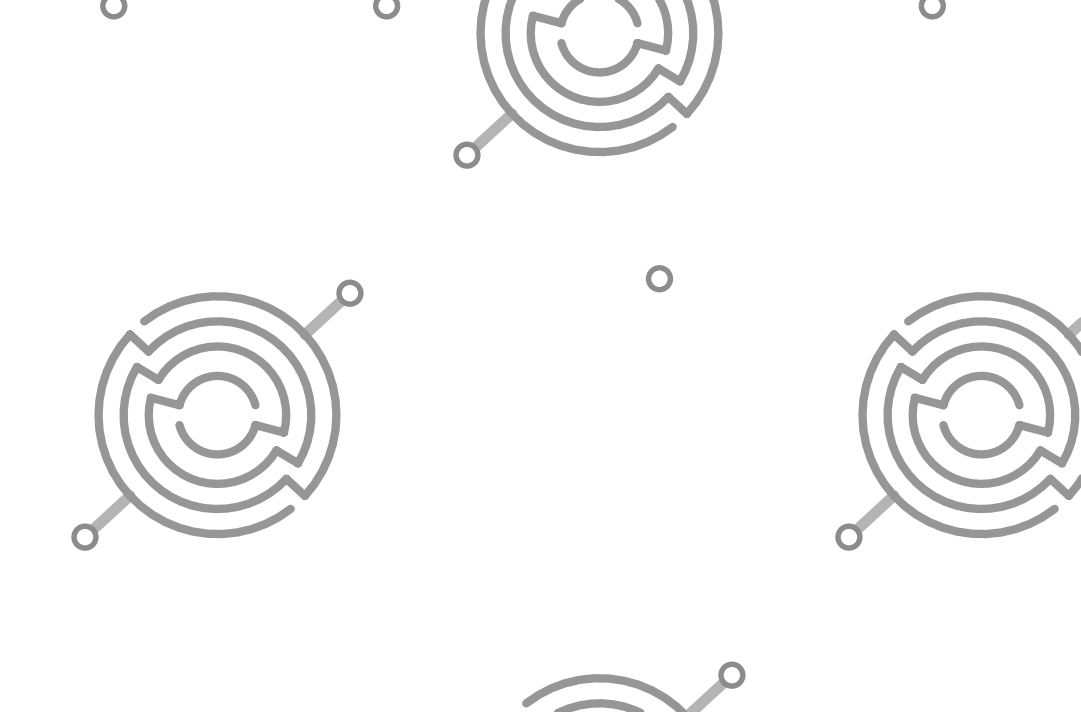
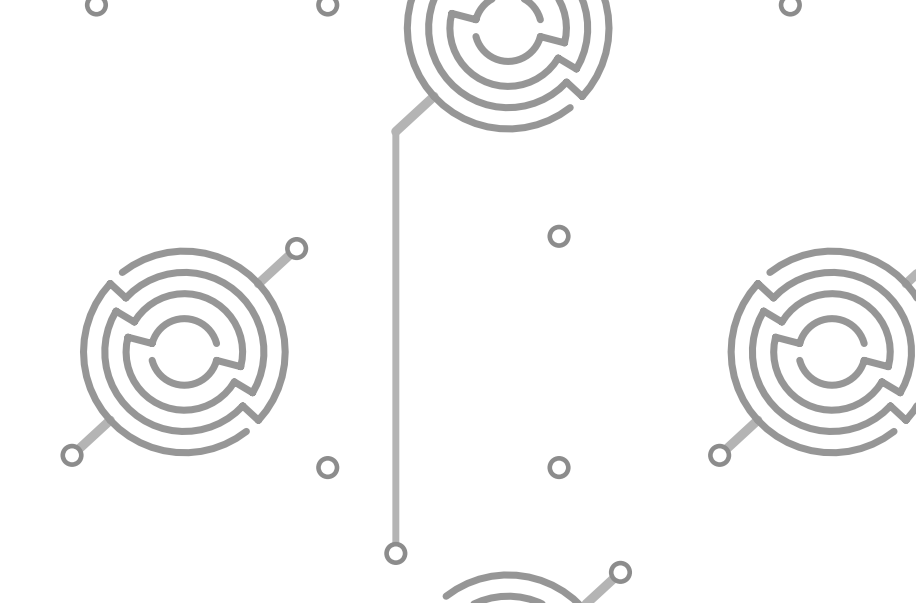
track: none -> (395, 131) (395, 553)
via: (466, 155) -> none
via: none -> (327, 467)
via: none -> (559, 467)
via: none -> (395, 553)

